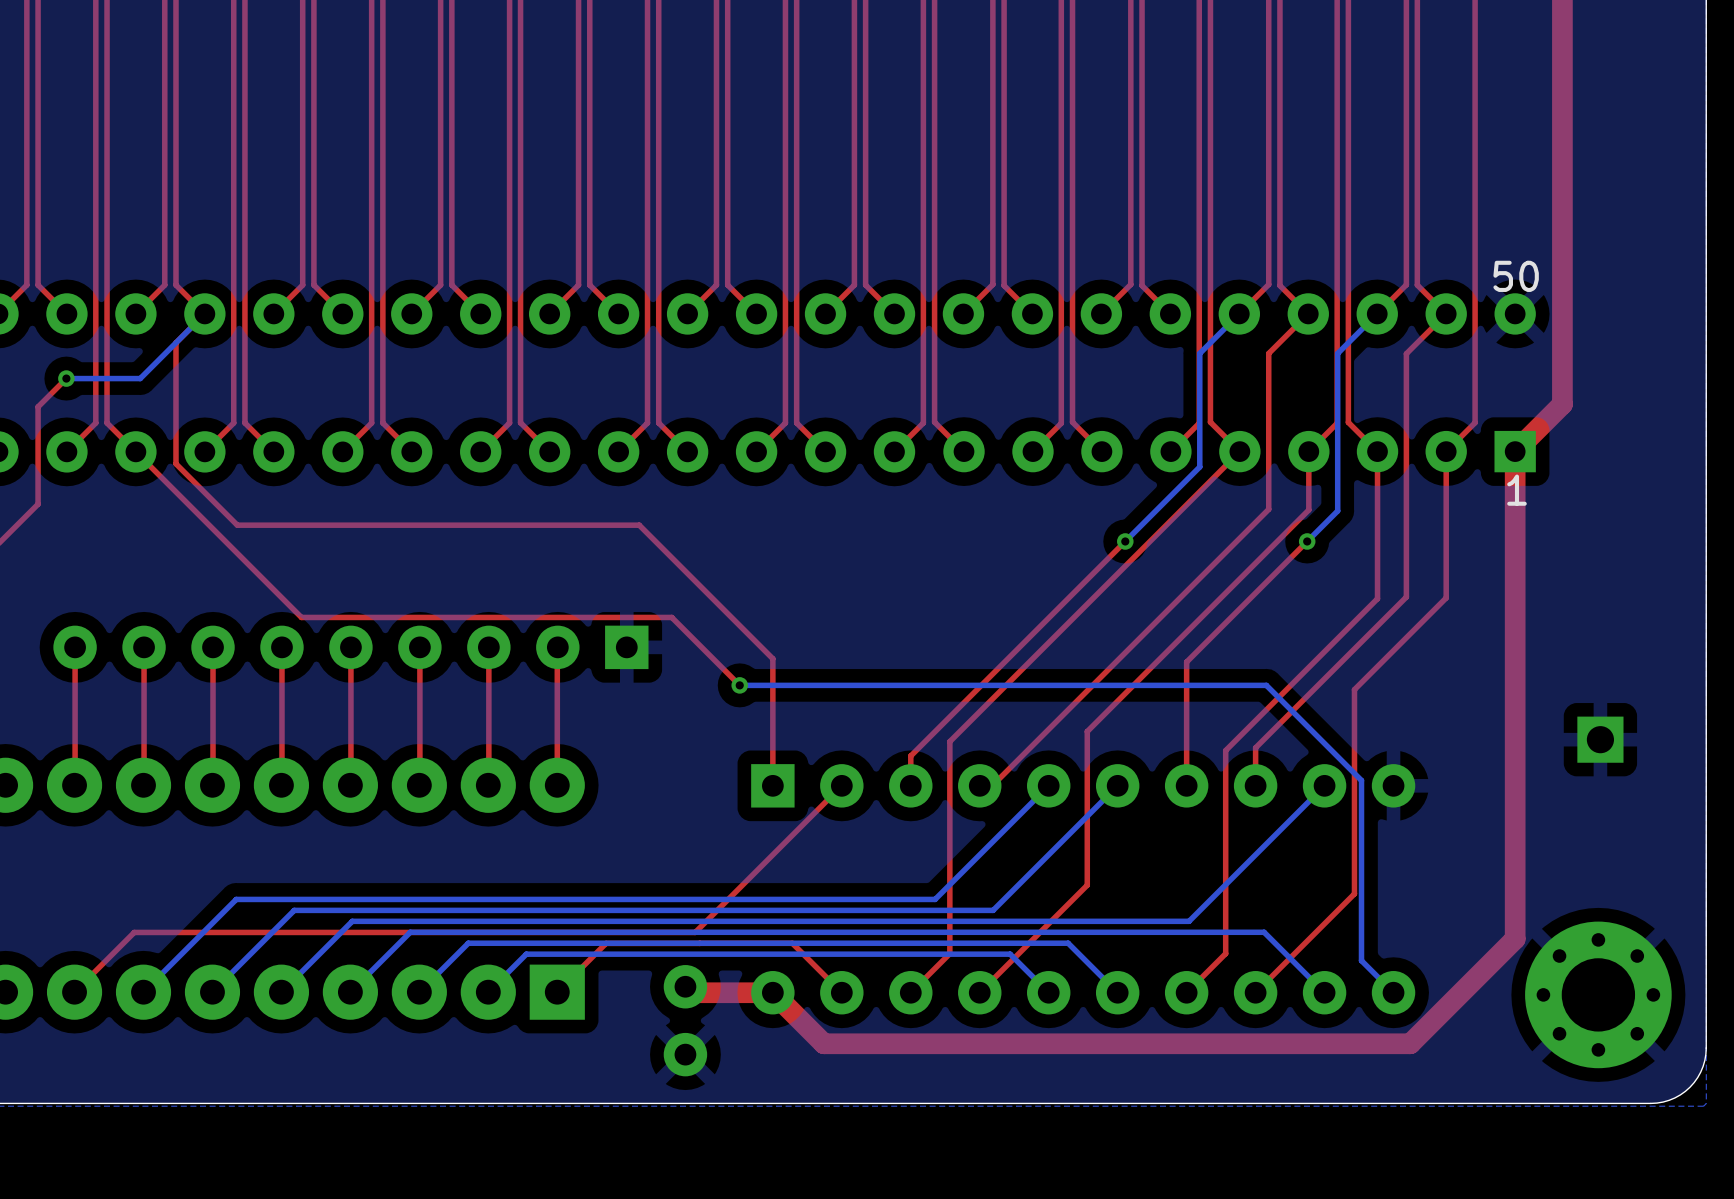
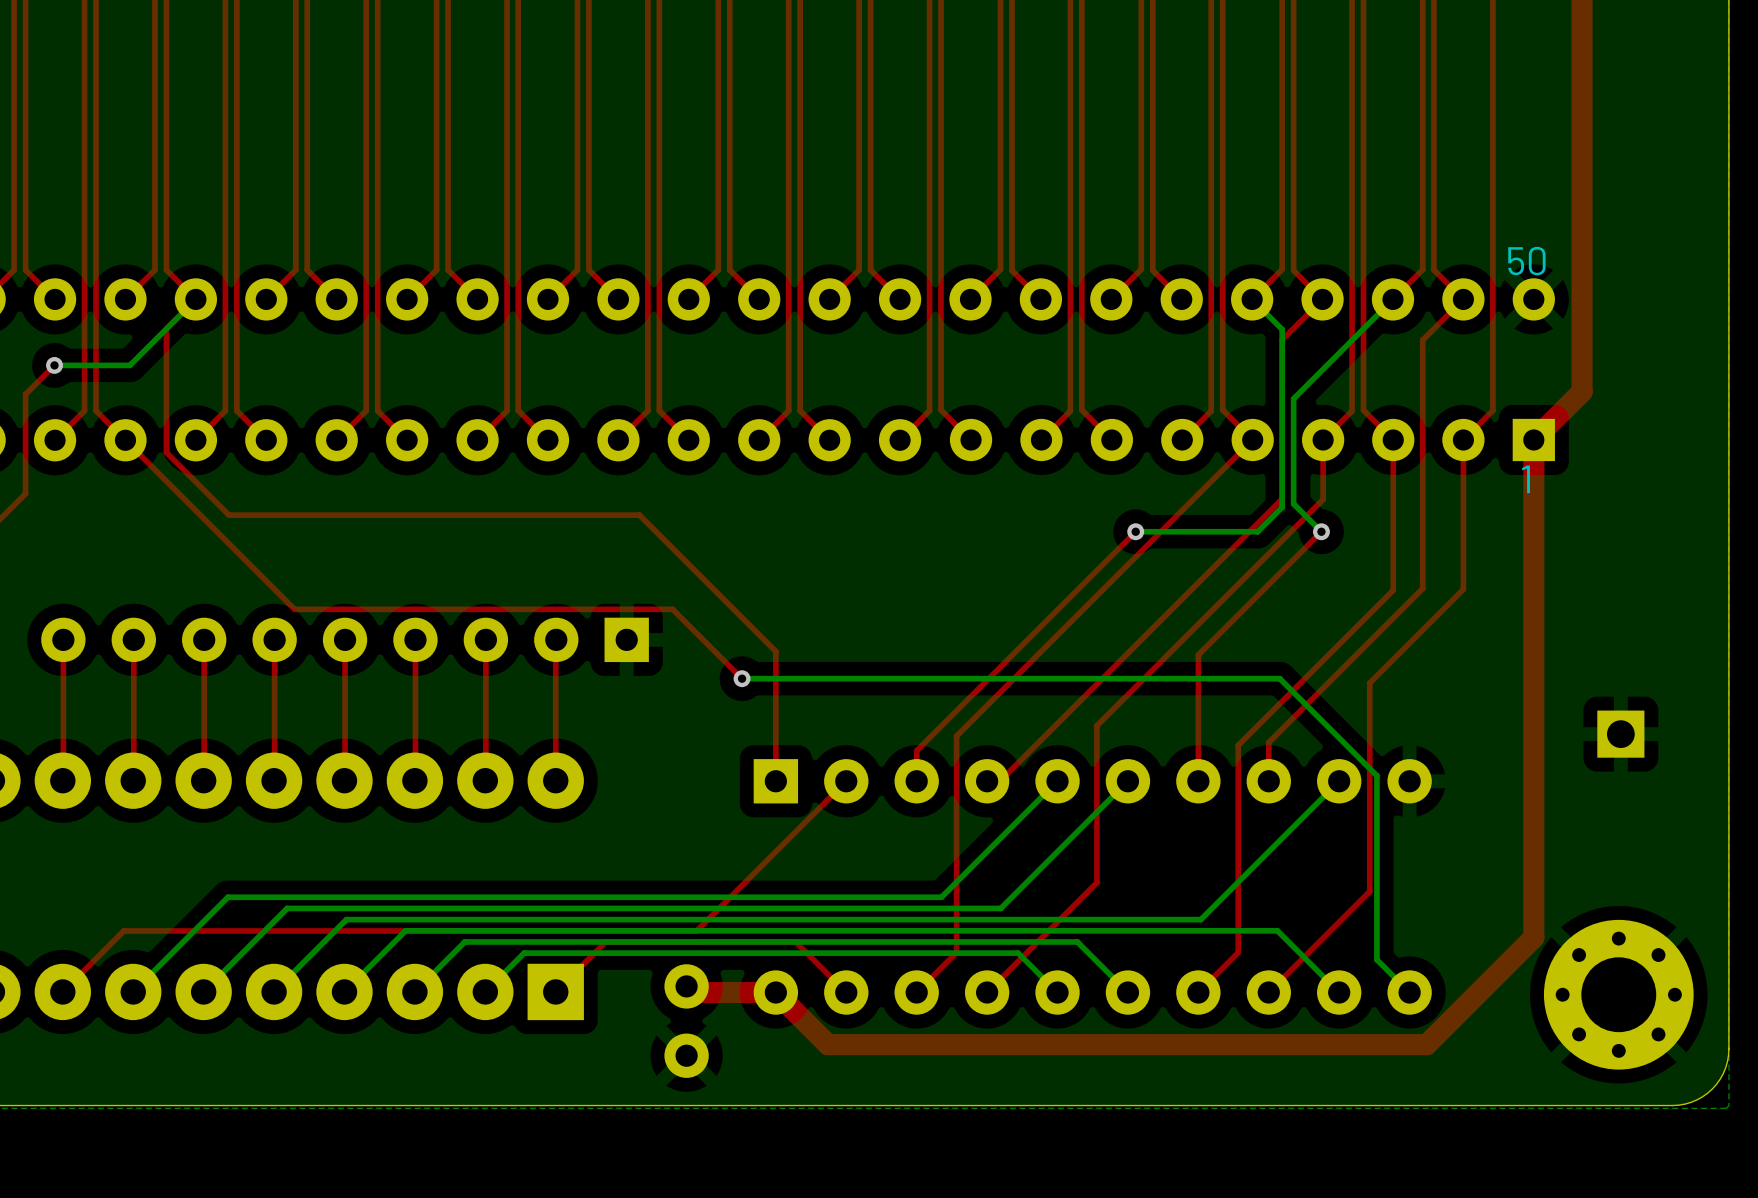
bottom track: (1239, 313) (1199, 353) (1199, 466) (1125, 541) -> (1252, 299) (1282, 329) (1282, 507) (1257, 531) (1135, 531)
bottom track: (1337, 353) (1337, 510) (1307, 541) -> (1352, 339) (1293, 398) (1293, 503) (1321, 531)

